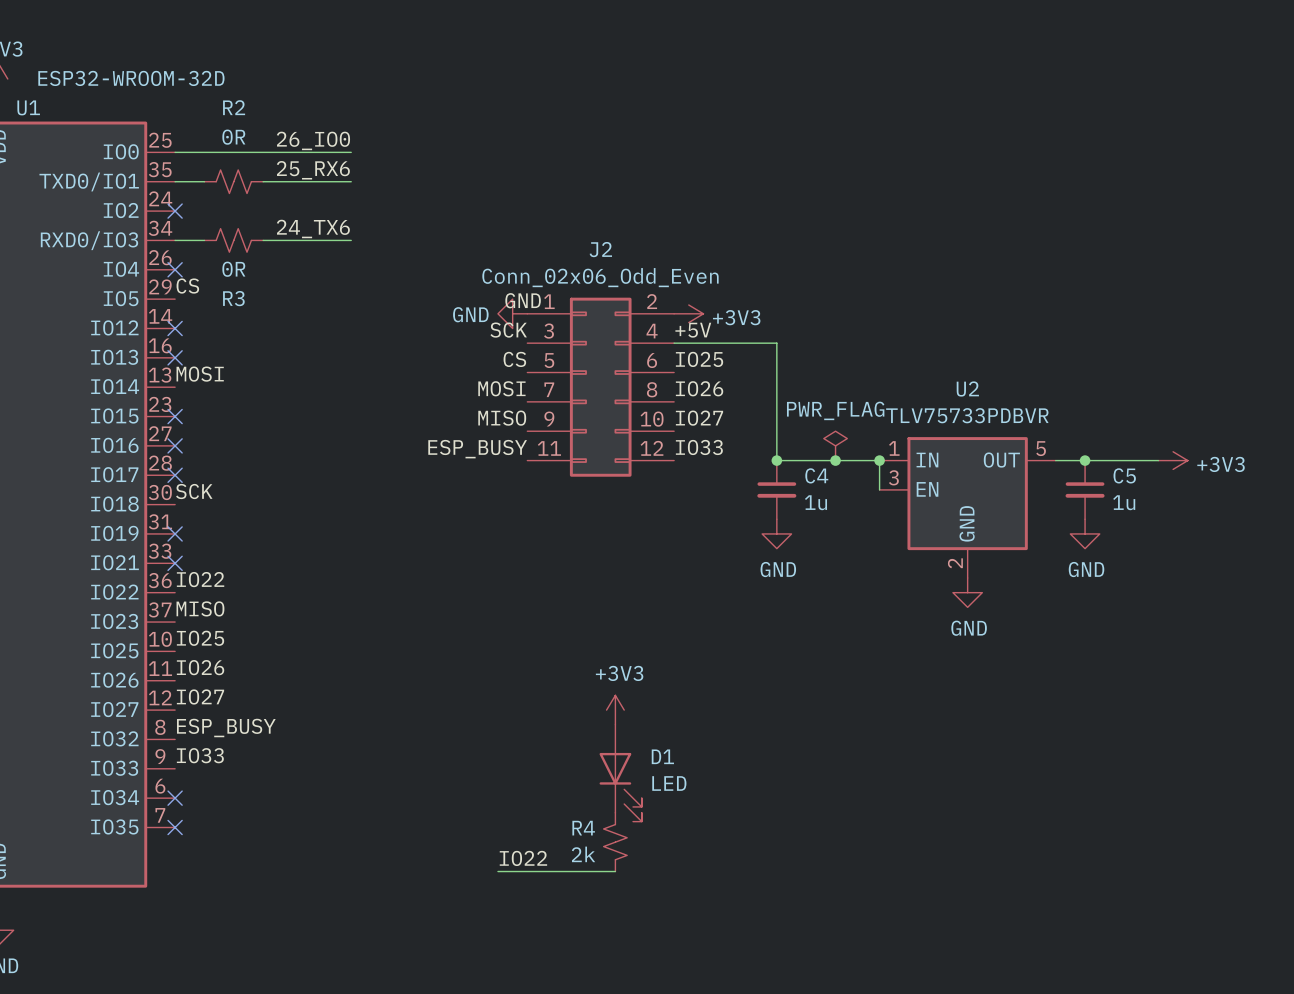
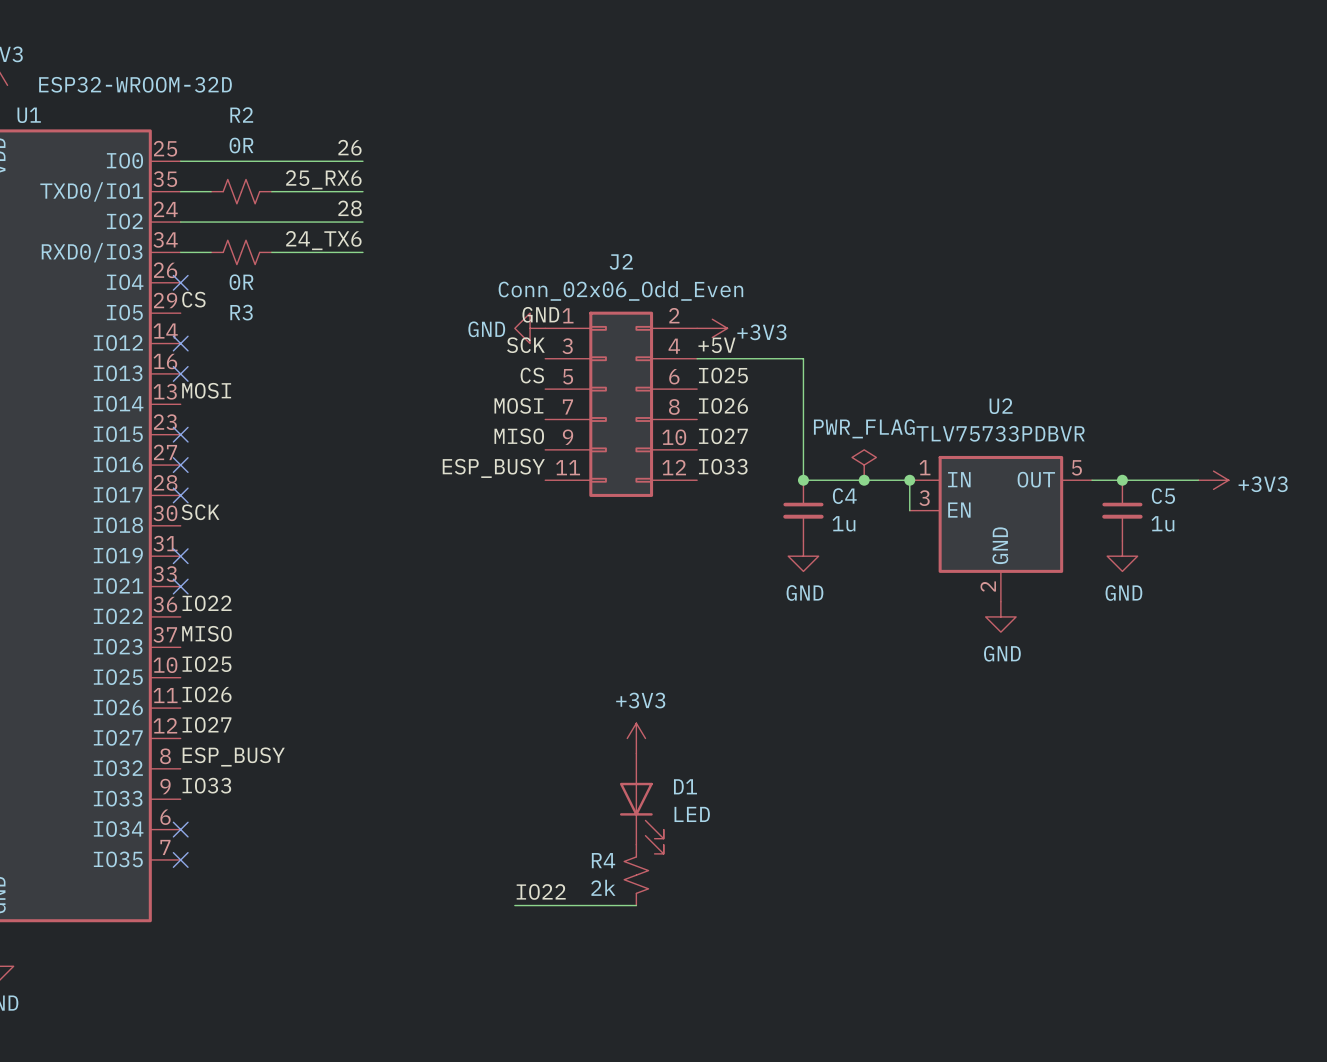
label: 26_IO0 (313, 140) -> 26 (349, 147)
label: none -> 28 (350, 208)
wire: none -> (180, 222) (362, 222)
no-connect mark: (175, 211) -> none

